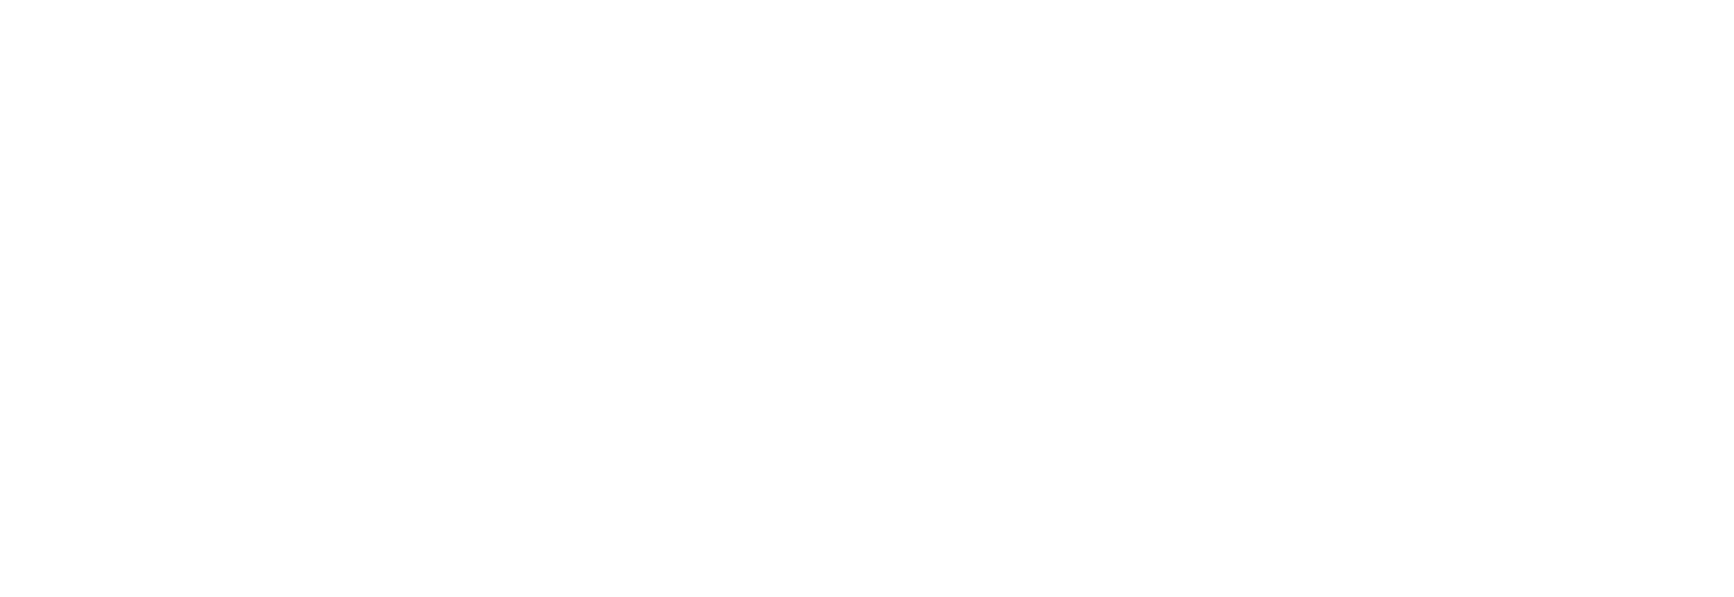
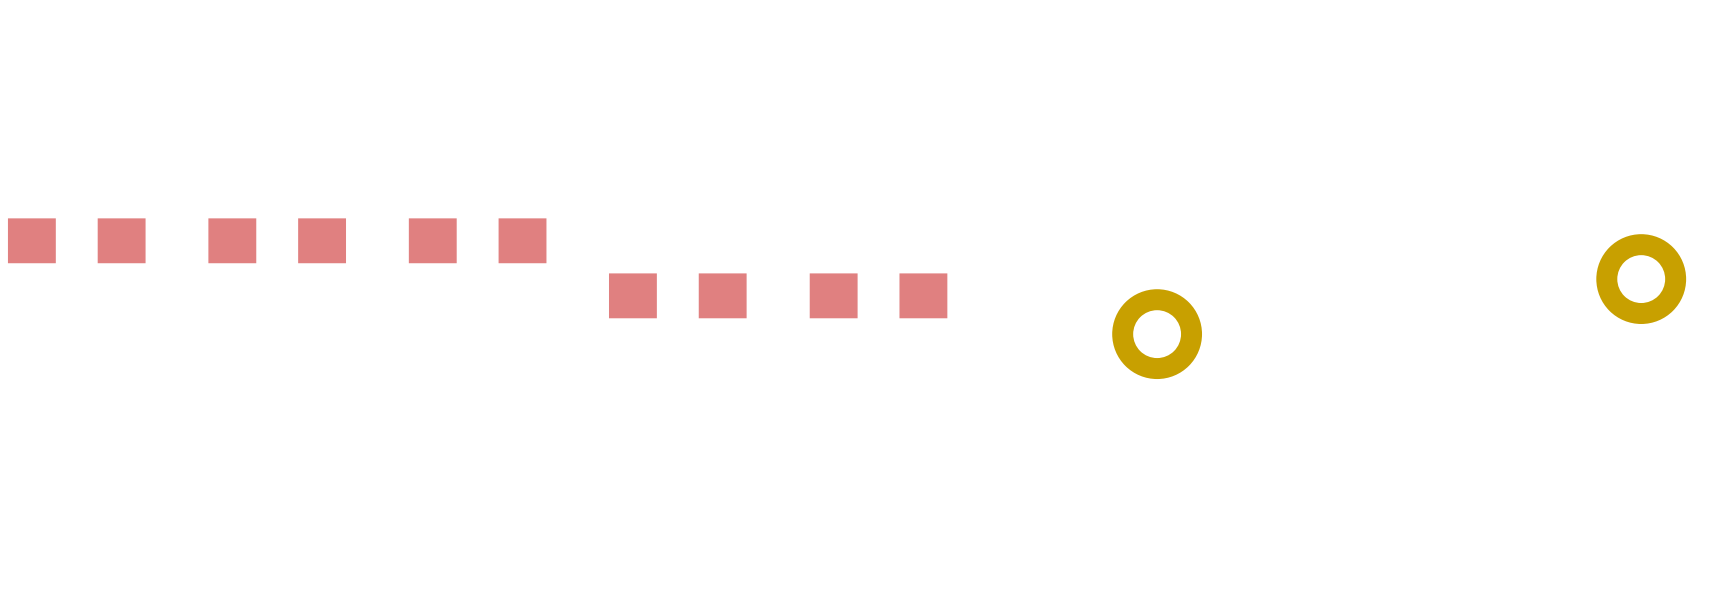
part: none -> (76, 240)
part: none -> (277, 240)
part: none -> (477, 240)
part: none -> (1641, 279)
part: none -> (677, 295)
part: none -> (878, 295)
part: none -> (1157, 334)

